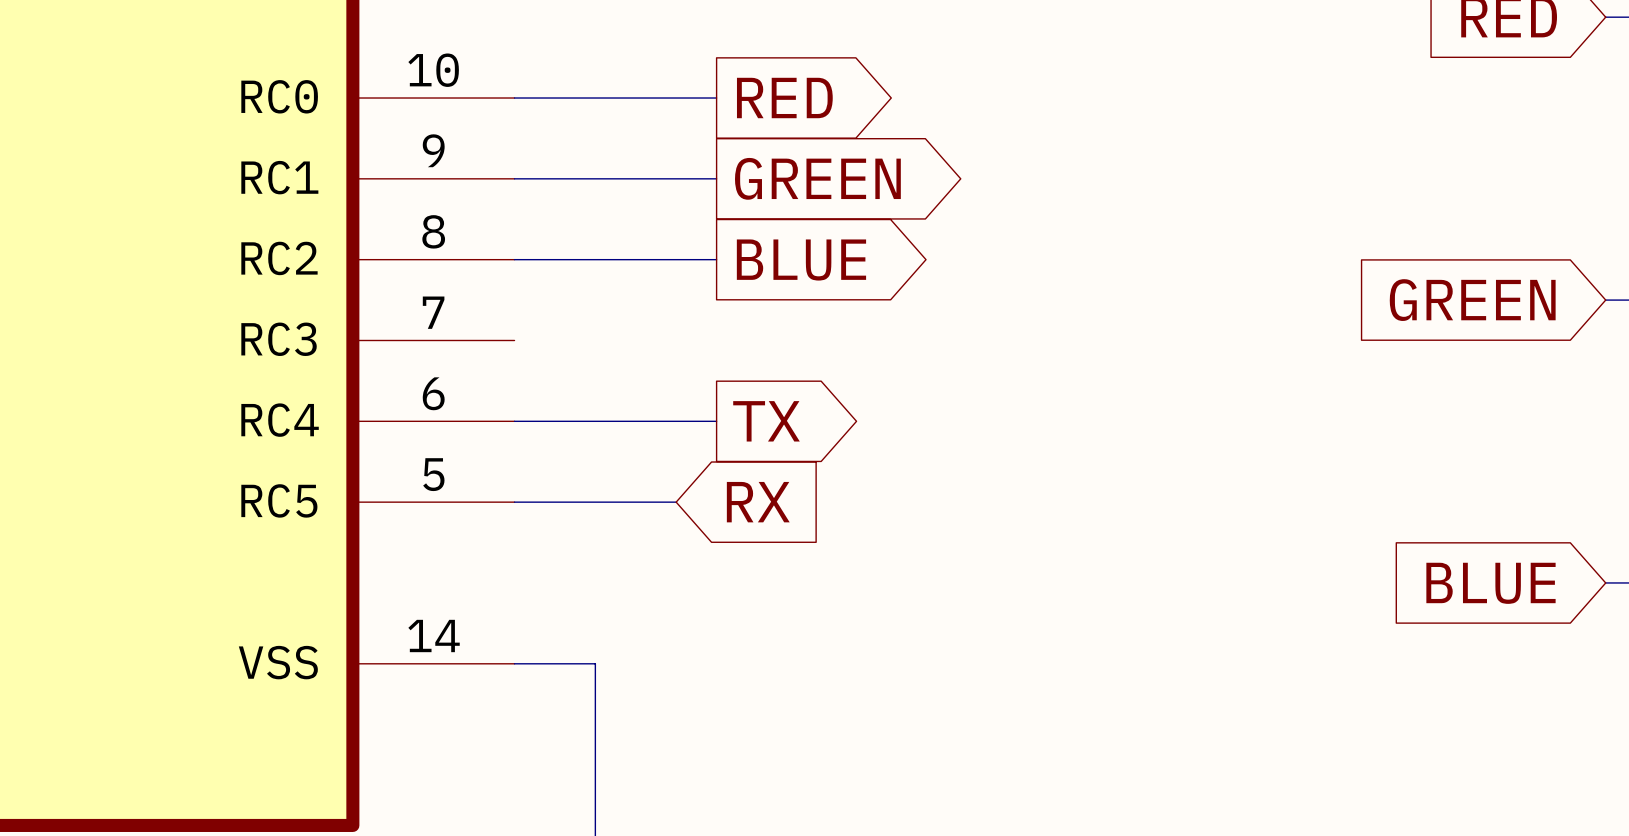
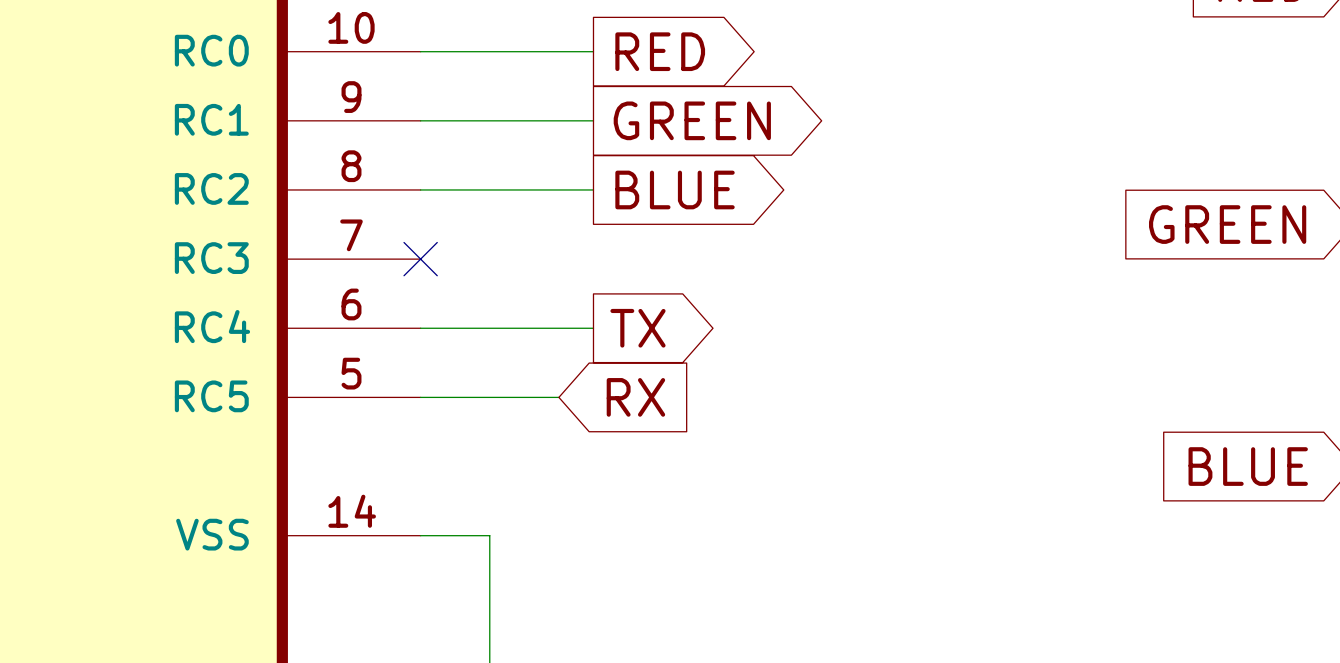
no-connect mark: none -> (420, 259)

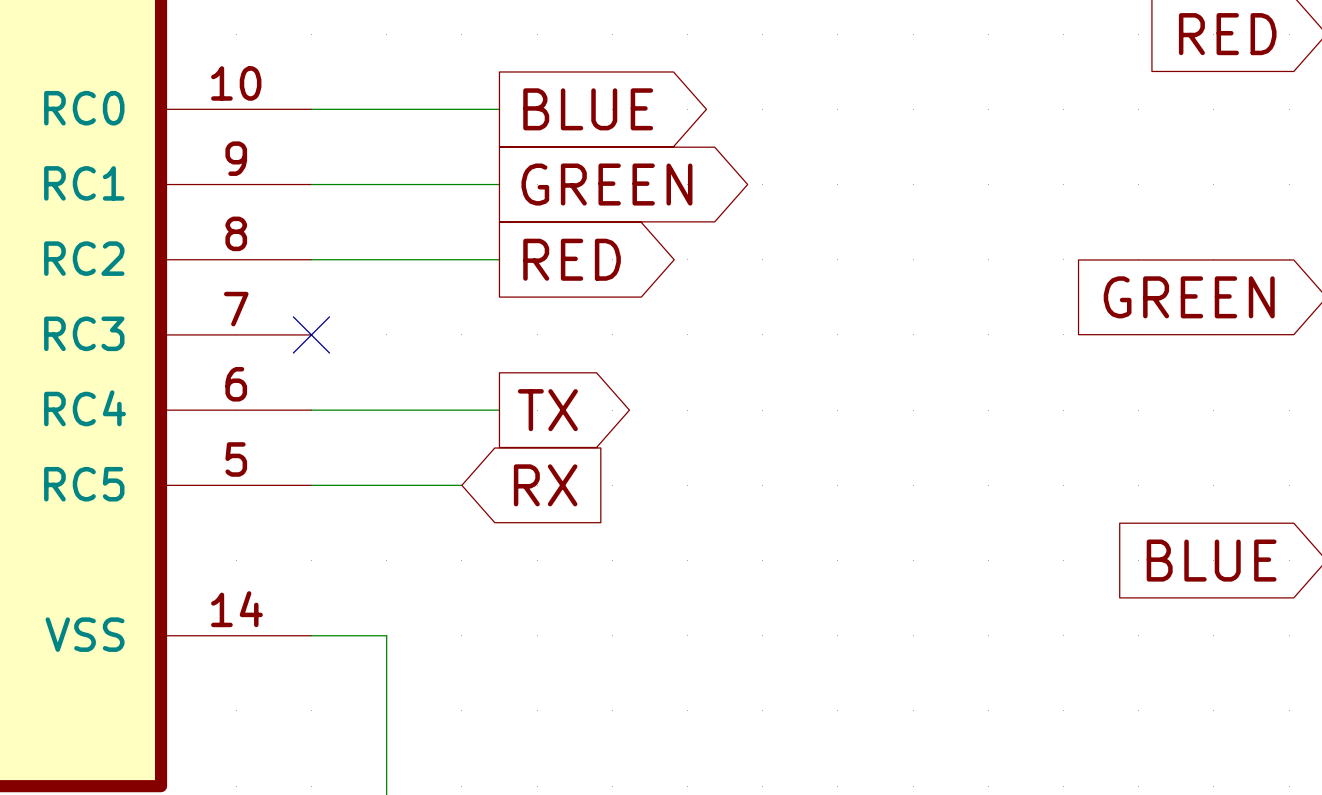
global label: RED (660, 51) -> BLUE (588, 109)
global label: BLUE (675, 189) -> RED (572, 259)

